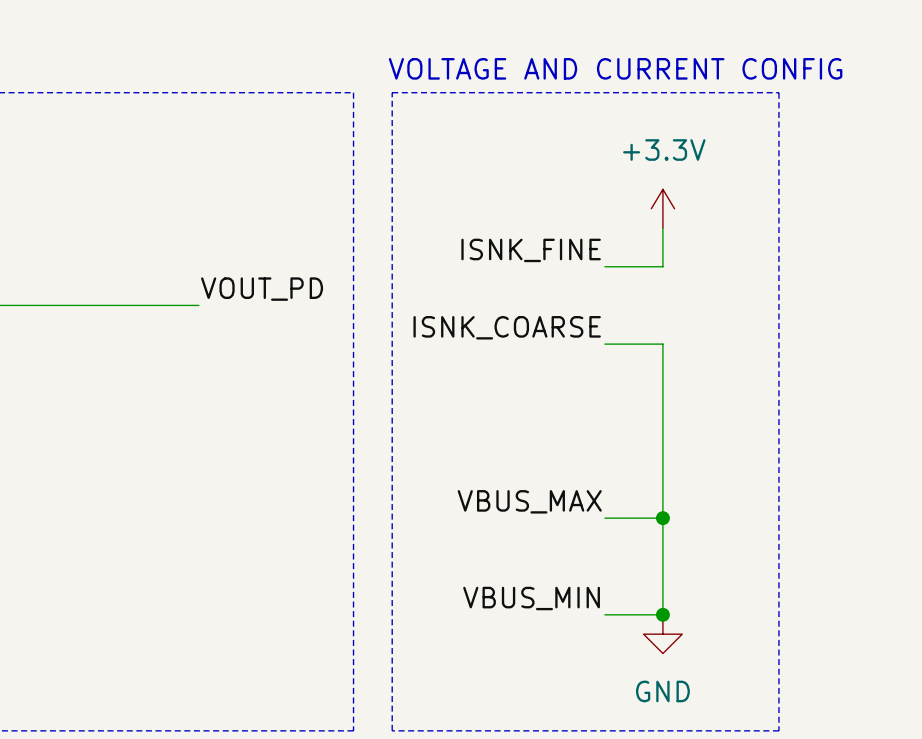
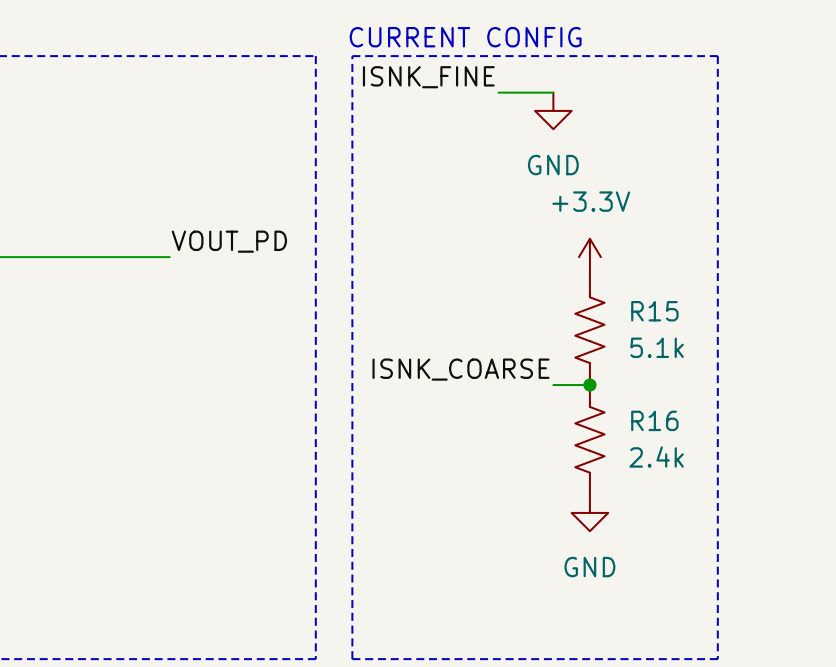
text: VOLTAGE AND CURRENT CONFIG (615, 68) -> CURRENT CONFIG (465, 37)
wire: none -> (498, 92) (553, 92)
power symbol: none -> GND (553, 110)
power symbol position: +3.3V (662, 208) -> +3.3V (589, 257)
wire: (662, 228) (662, 266) (604, 266) -> none
label position: ISNK_FINE (531, 250) -> ISNK_FINE (428, 77)
label position: ISNK_COARSE (507, 327) -> ISNK_COARSE (461, 369)
wire: (604, 344) (662, 344) (662, 614) (604, 614) -> none
R15: none -> 5.1k (589, 330)
wire: none -> (553, 385) (589, 385)
R16: none -> 2.4k (589, 439)
label: VBUS_MAX (529, 501) -> none
wire: (604, 518) (662, 518) -> none
junction position: (662, 518) -> (589, 385)
label: VBUS_MIN (531, 598) -> none
junction: (662, 614) -> none
power symbol position: GND (662, 634) -> GND (589, 512)

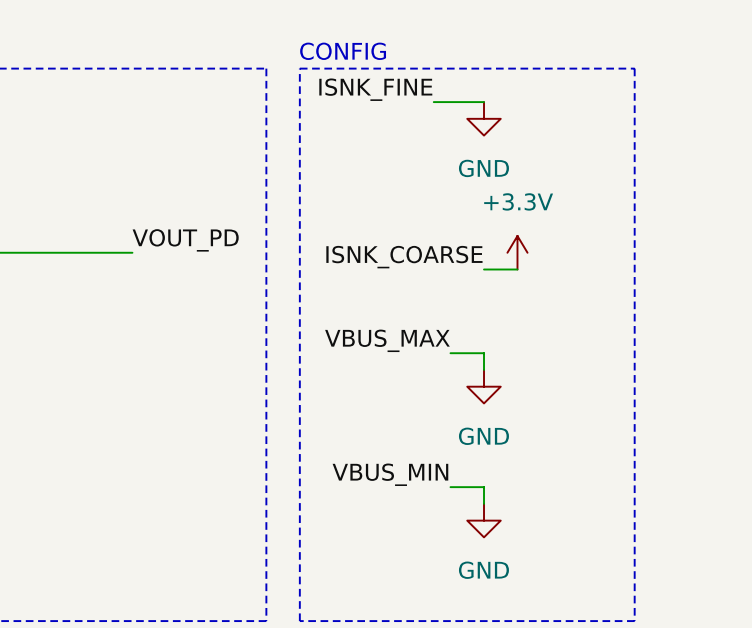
text: none -> CONFIG (343, 51)
text: CURRENT CONFIG (465, 37) -> none
wire: none -> (484, 269) (517, 269)
R15: 5.1k (589, 330) -> none
label: none -> VBUS_MAX (387, 340)
label position: ISNK_COARSE (461, 369) -> ISNK_COARSE (404, 257)
wire: (553, 385) (589, 385) -> (484, 369) (484, 353) (450, 353)
junction: (589, 385) -> none
power symbol: none -> GND (484, 386)
R16: 2.4k (589, 439) -> none
label: none -> VBUS_MIN (390, 474)
wire: none -> (450, 487) (484, 487) (484, 503)
power symbol position: GND (589, 512) -> GND (484, 520)

